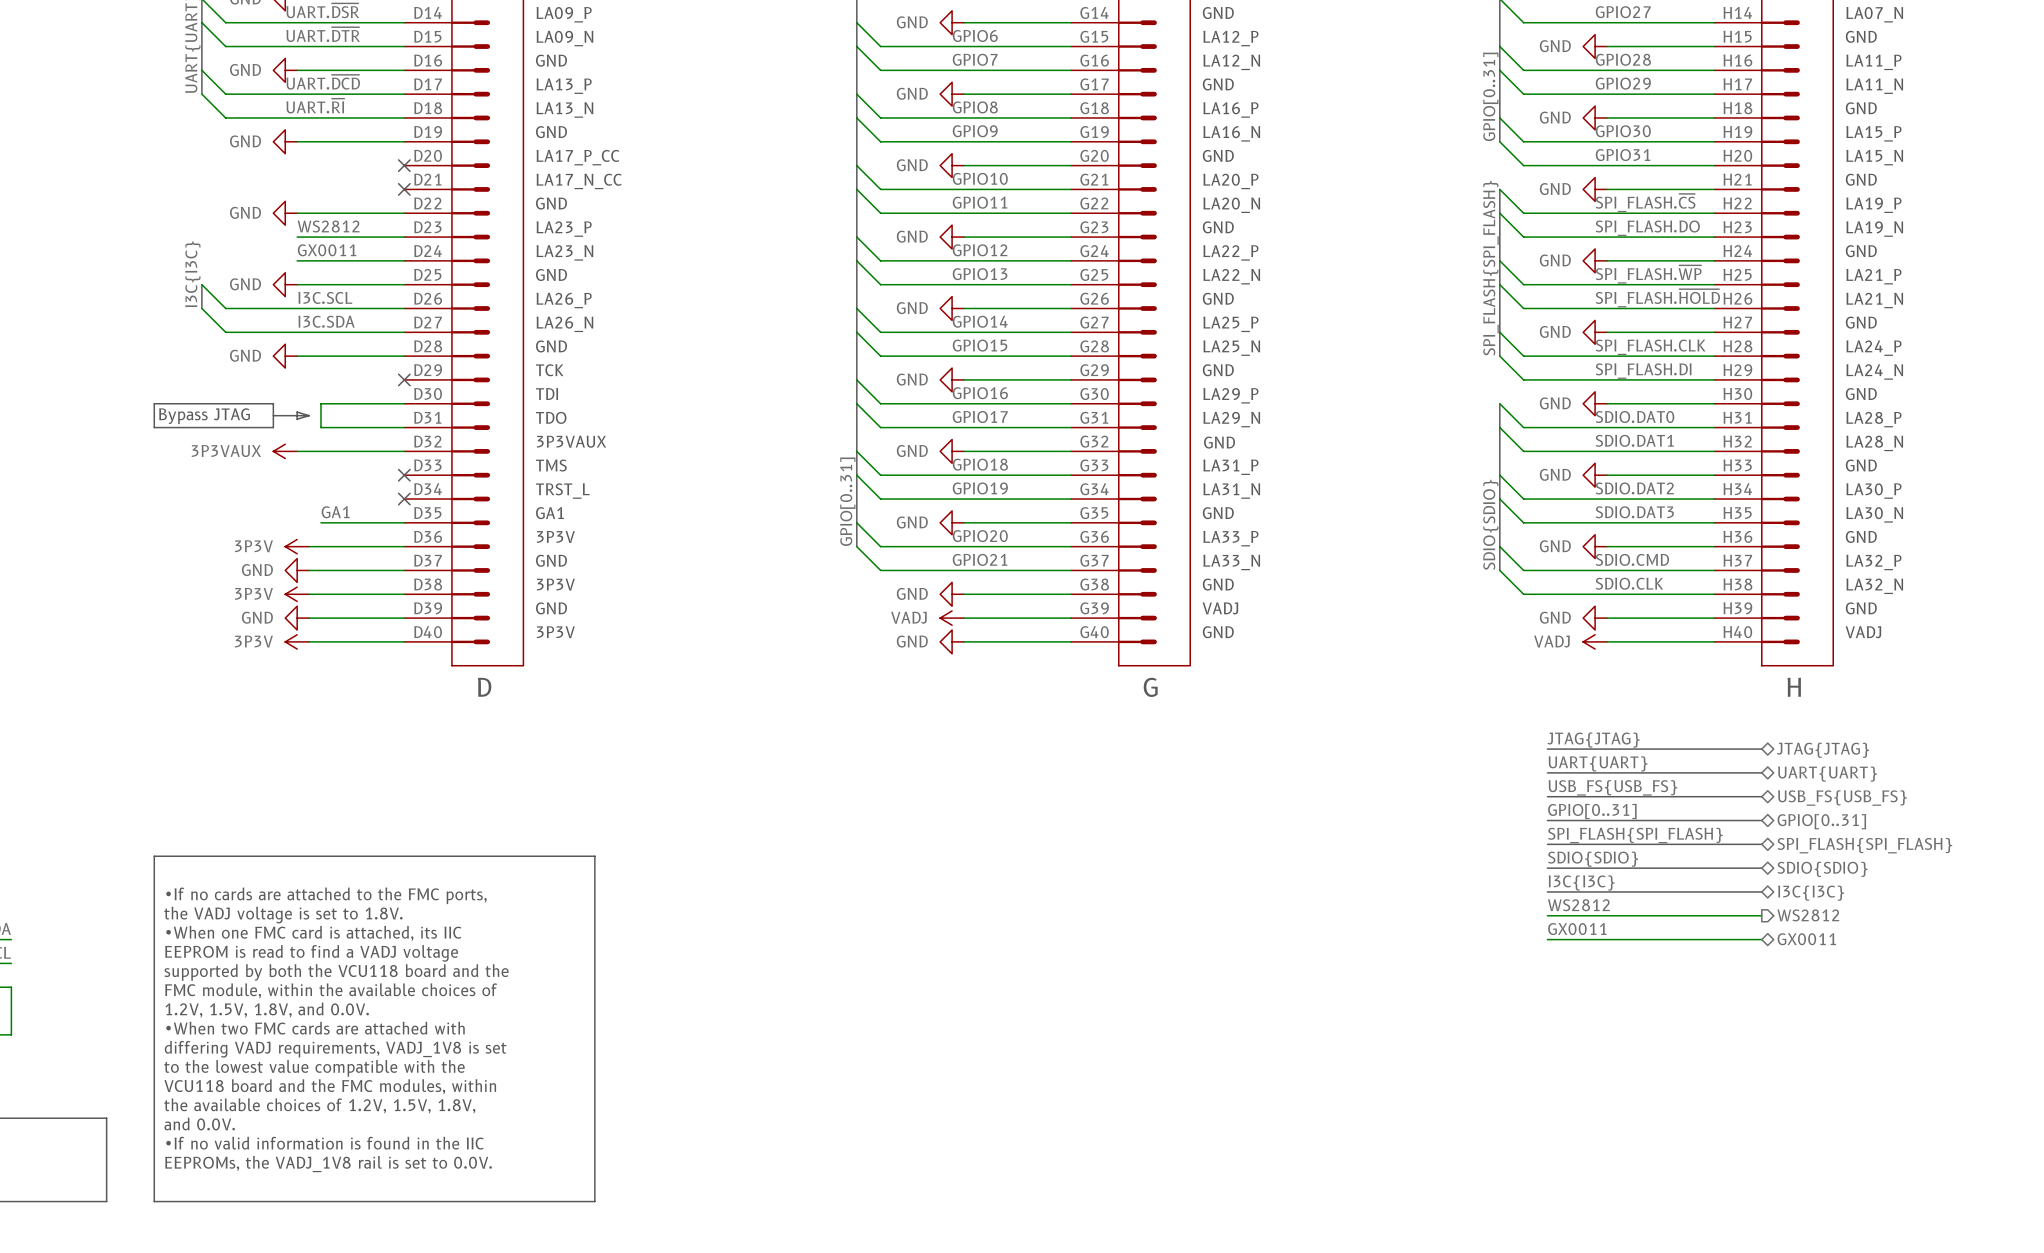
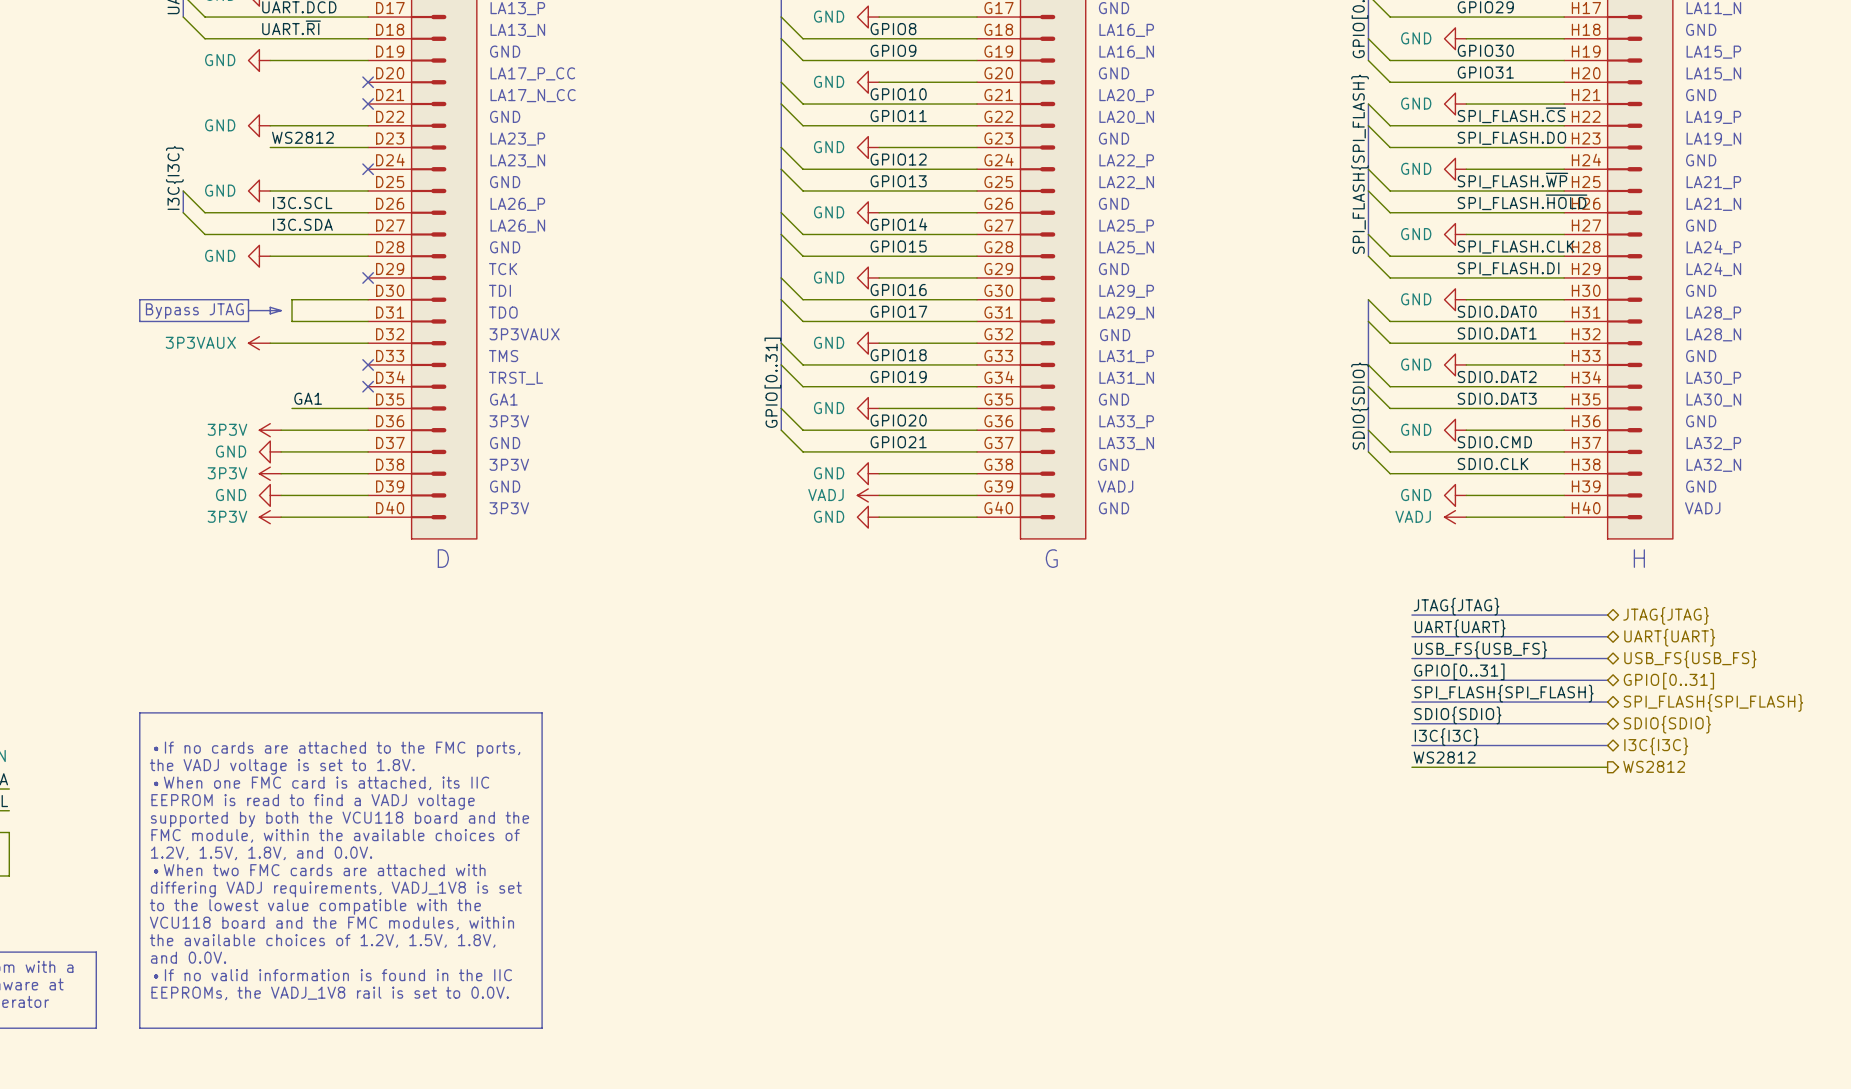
label: GX0011 (327, 250) -> none
wire: (297, 260) (404, 260) -> none
no-connect mark: none -> (368, 169)
label: GX0011 (1577, 929) -> none
wire: (1547, 939) (1761, 939) -> none
hierarchical label: GX0011 (1806, 939) -> none

